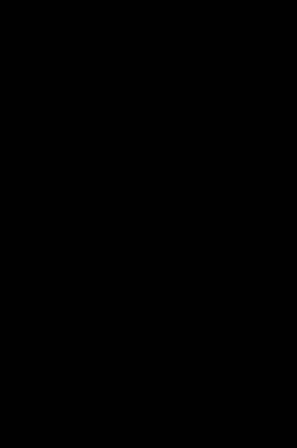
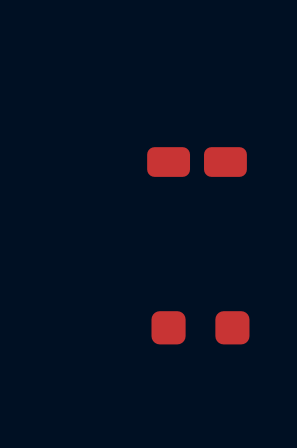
part: none -> (197, 162)
part: none -> (200, 327)

